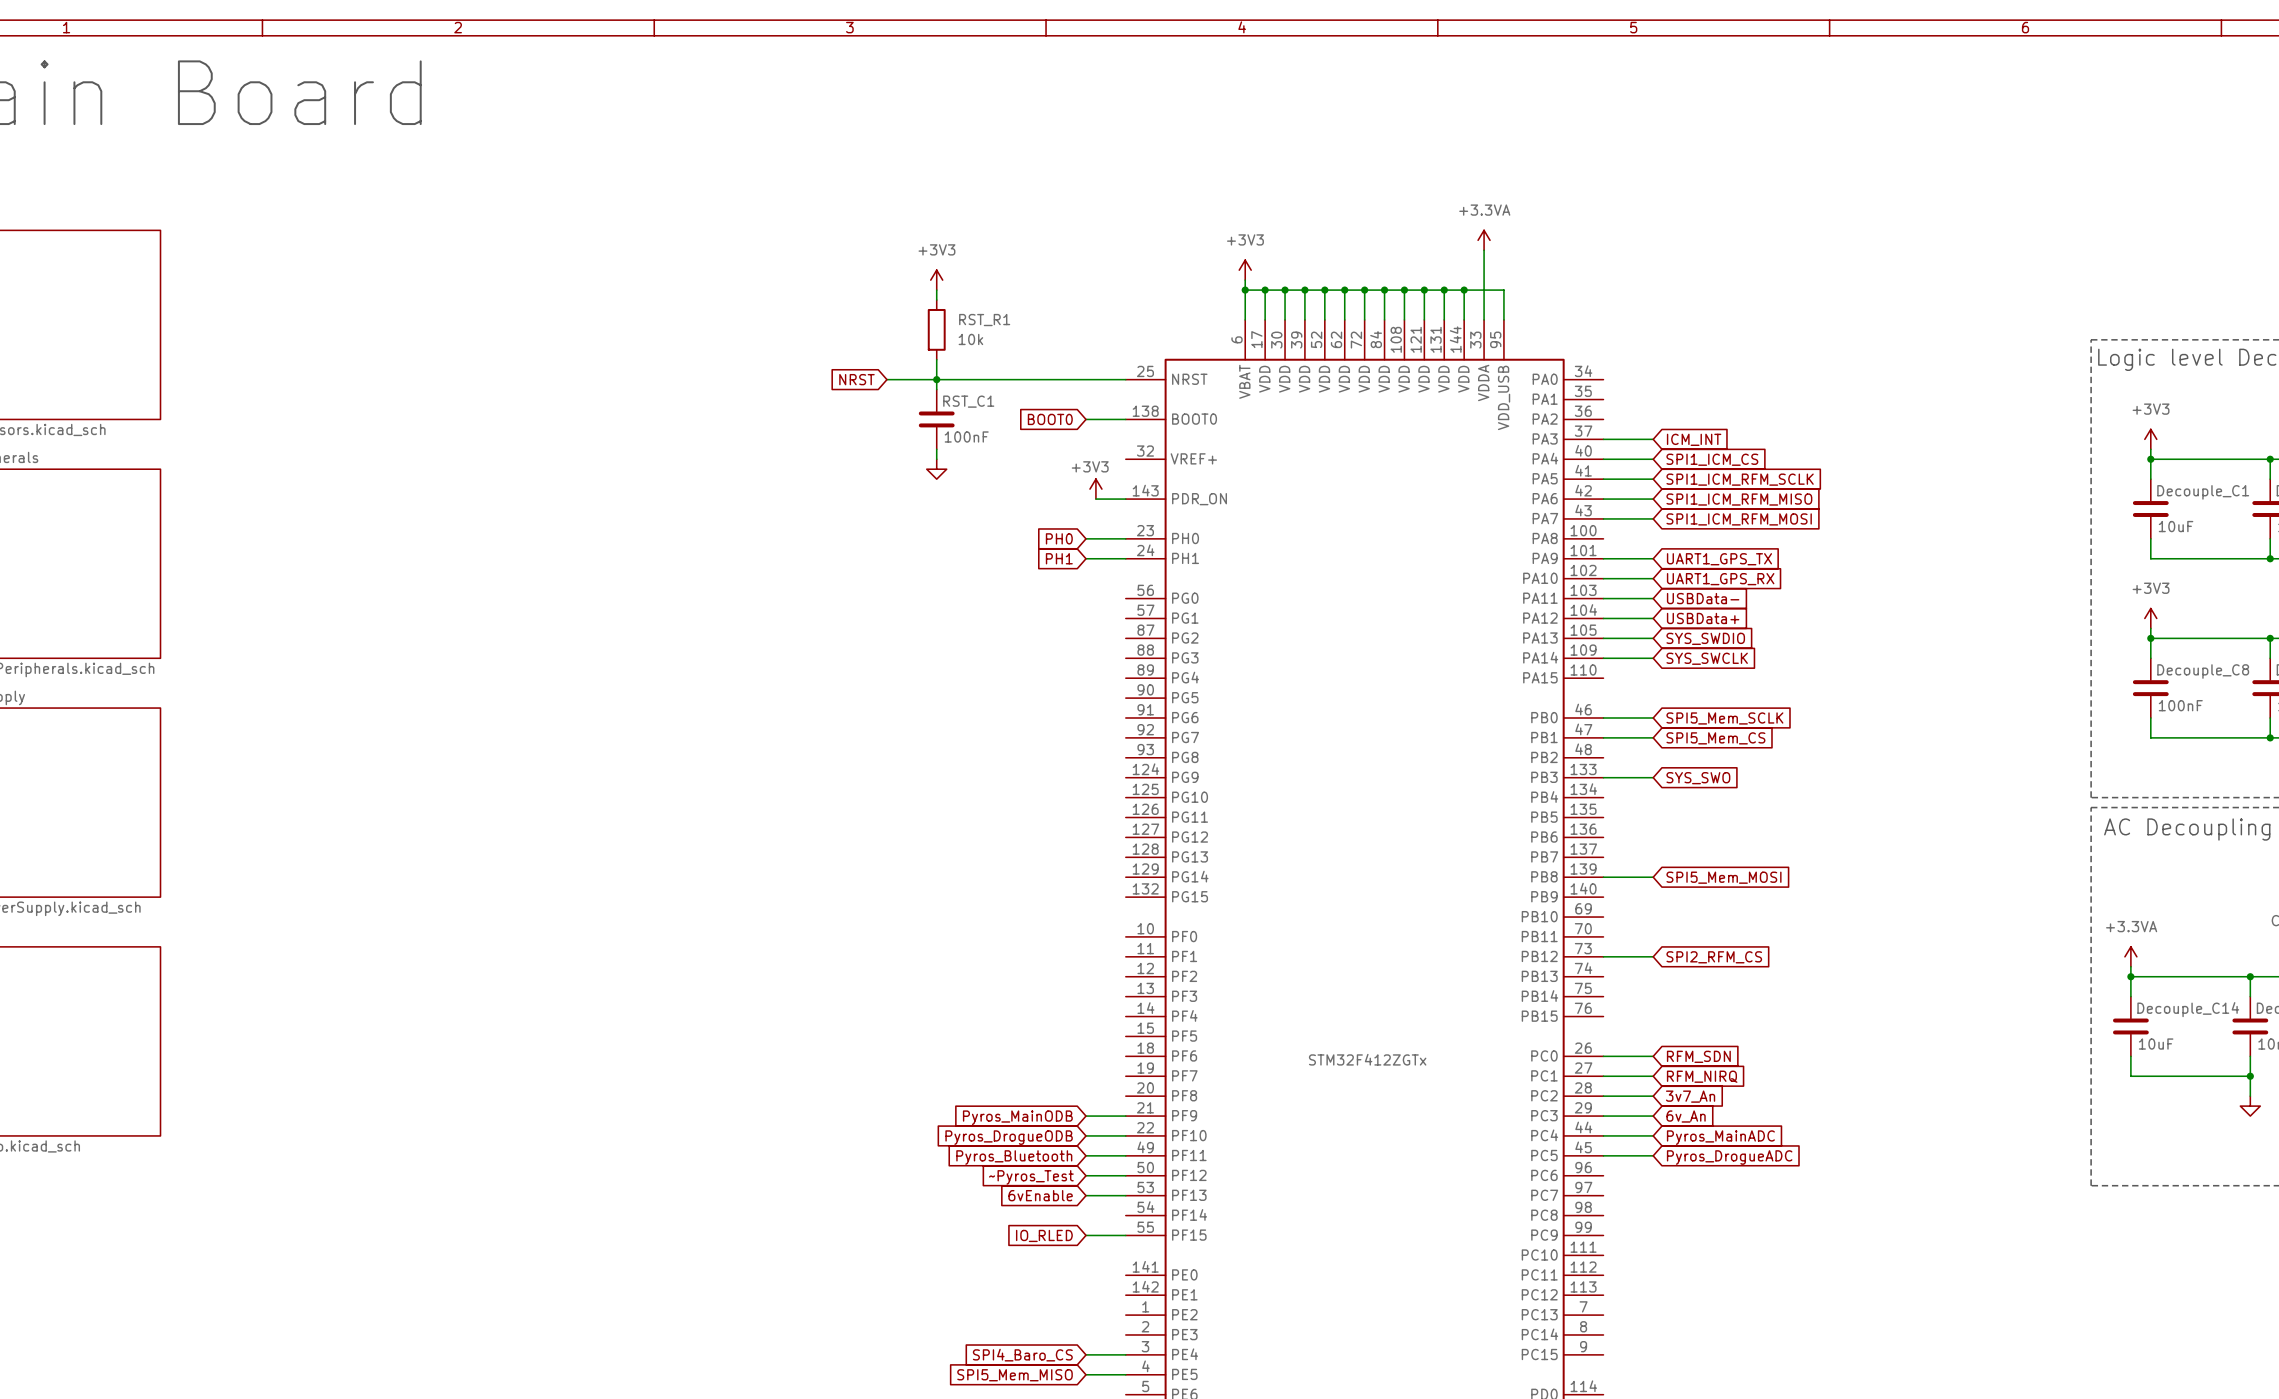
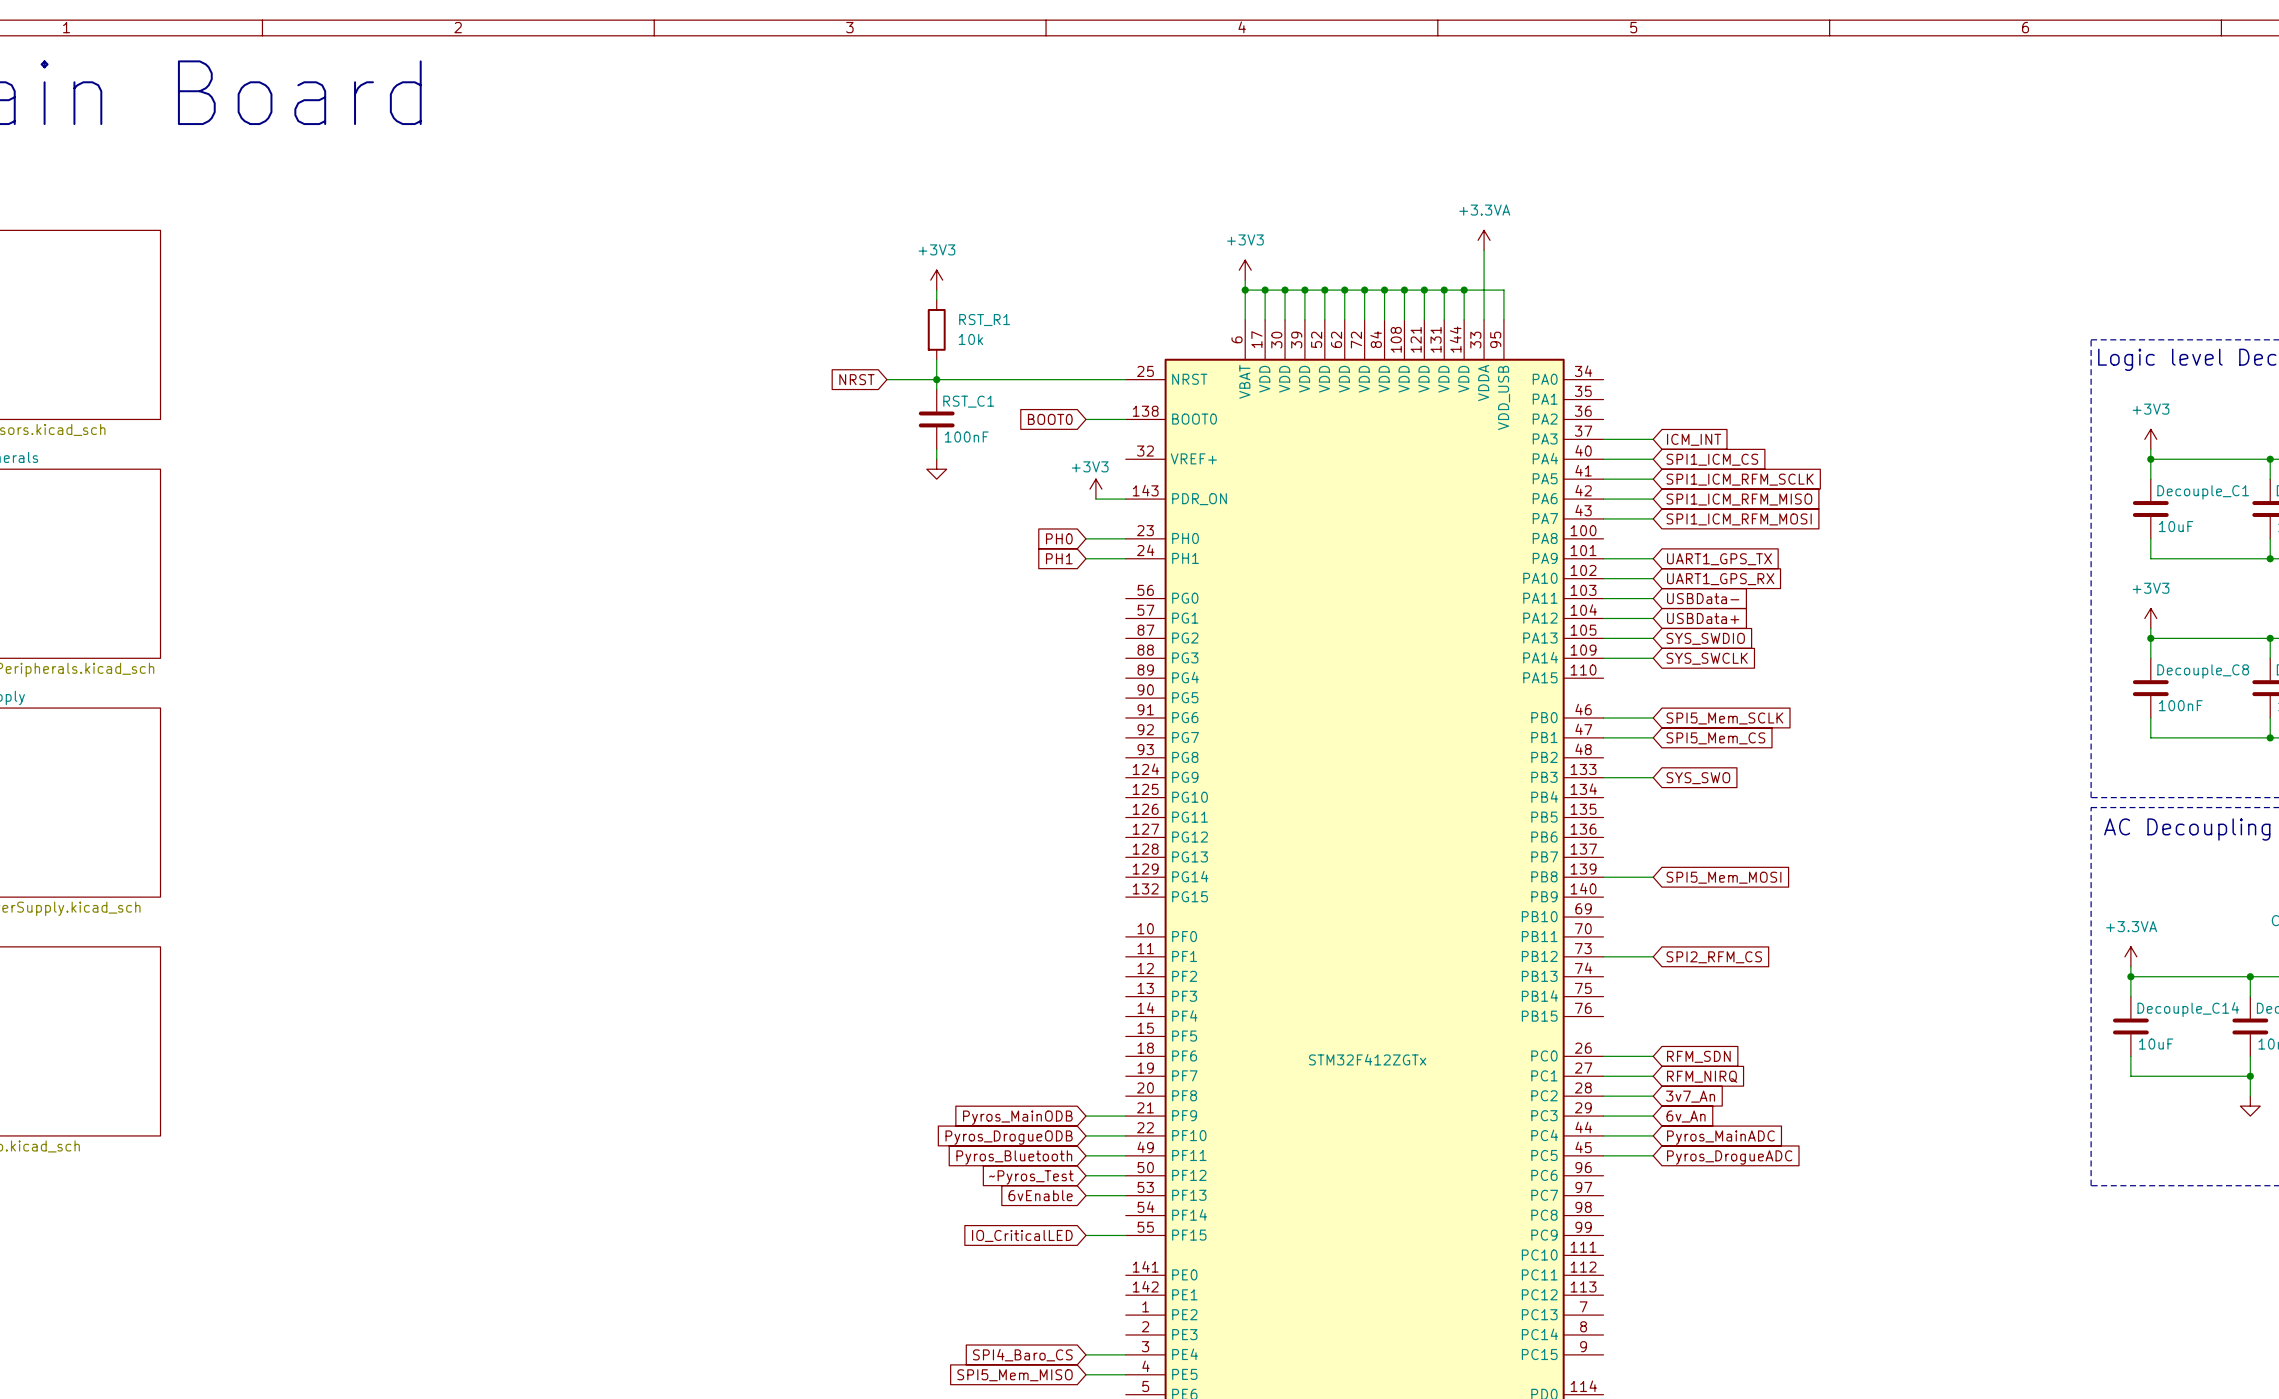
global label: IO_RLED (1044, 1235) -> IO_CriticalLED (1022, 1235)

